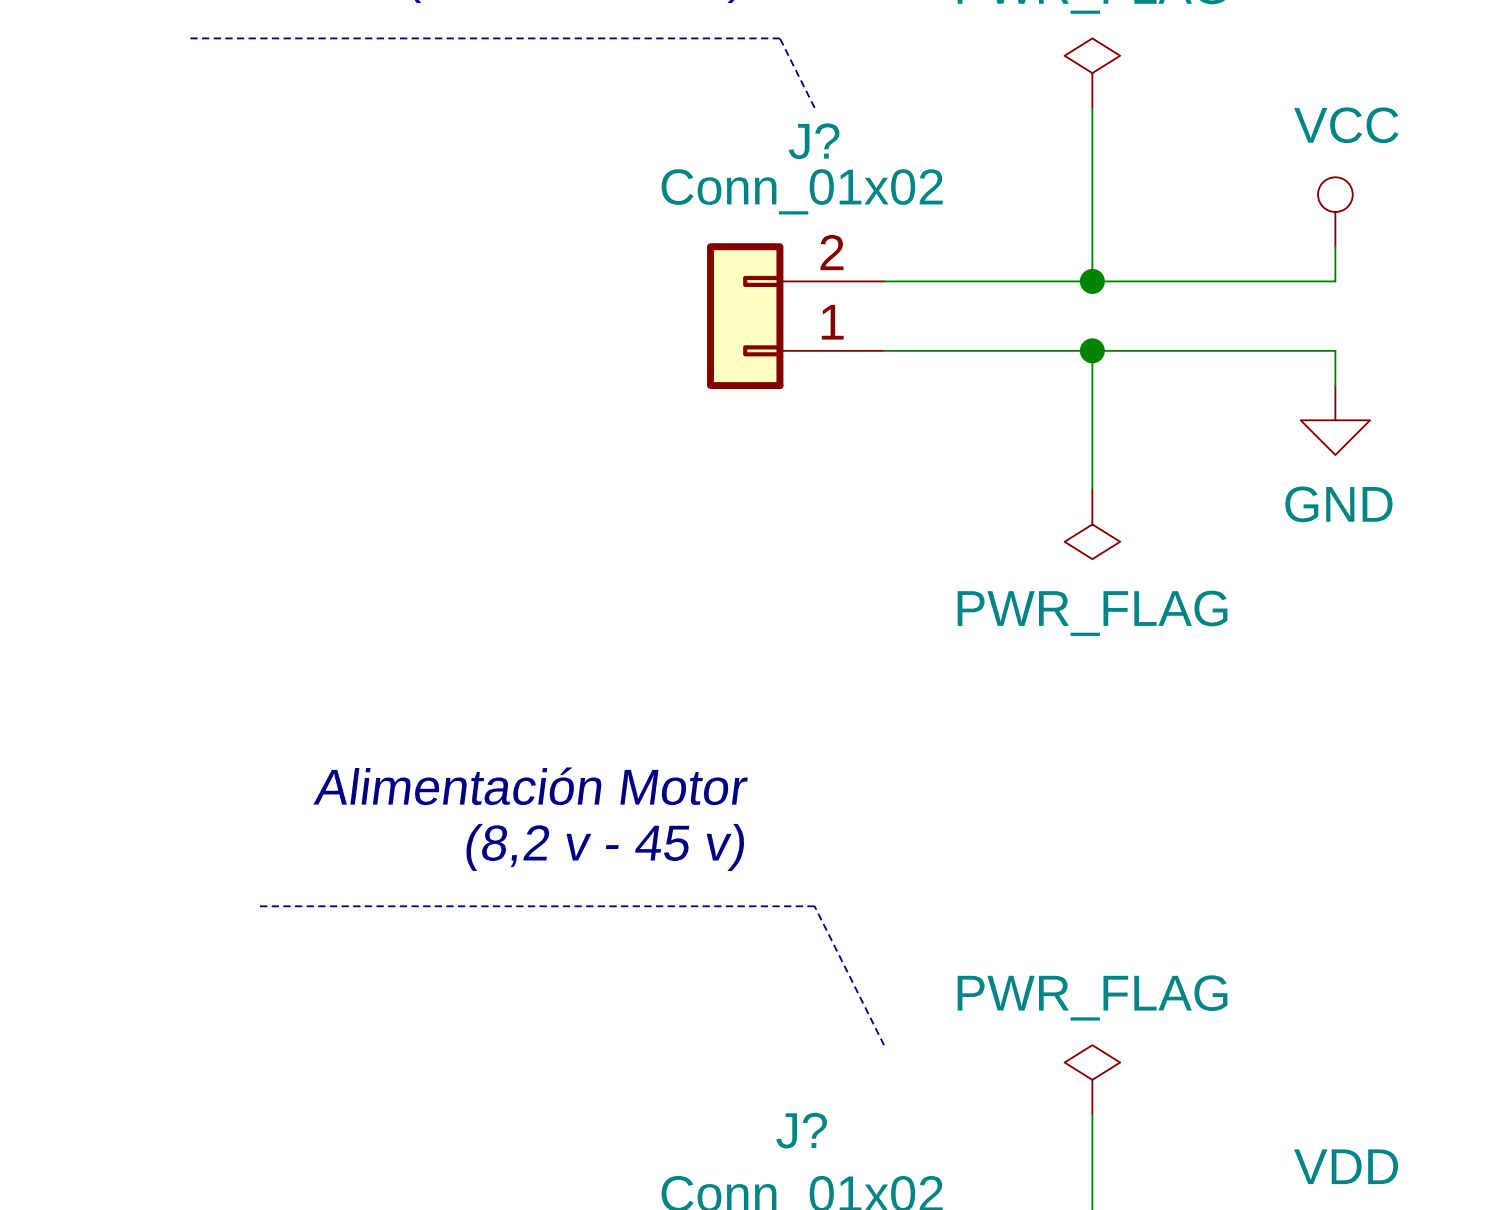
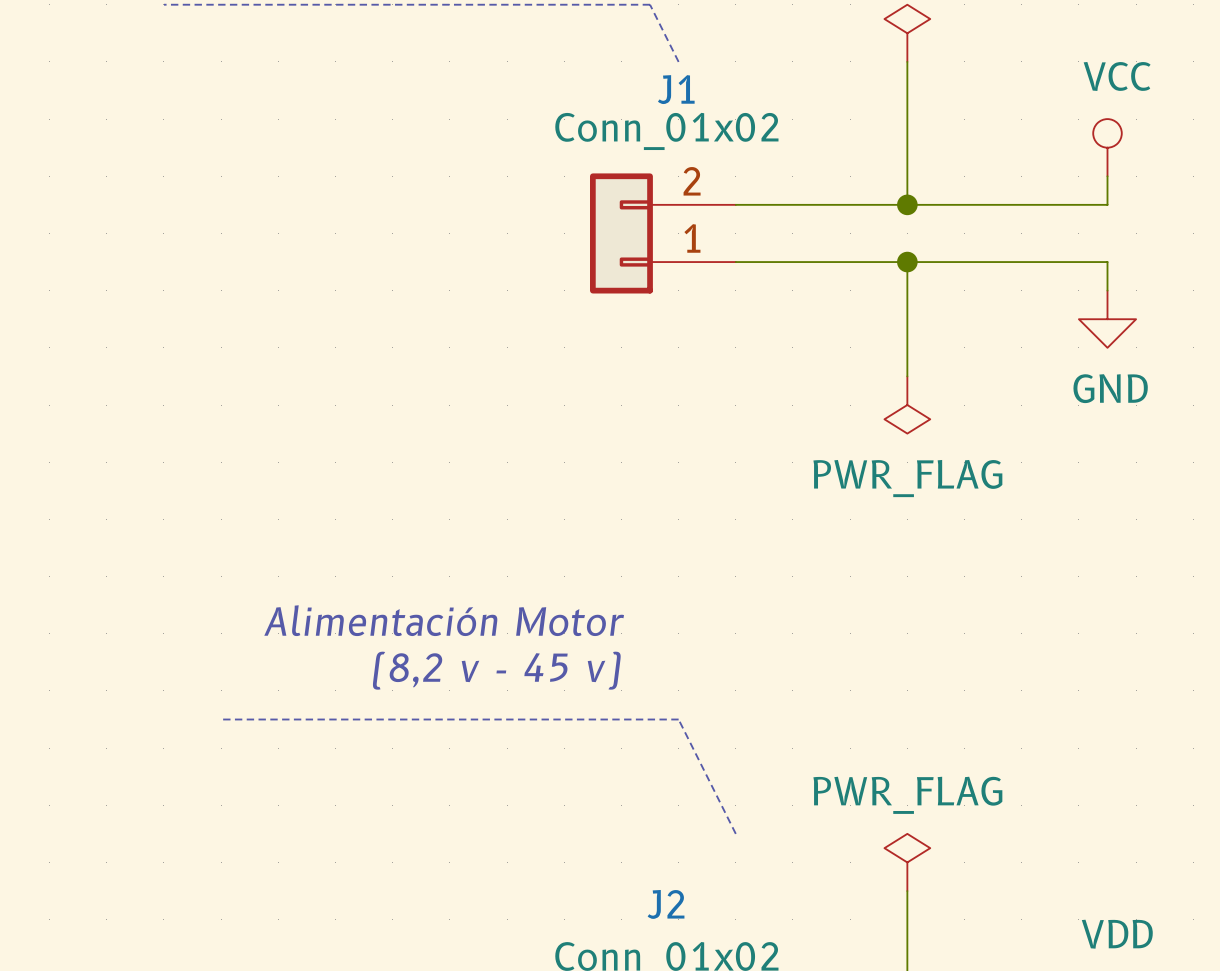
J? name: J? (814, 141) -> J1 (676, 89)
J? name: J? (801, 1130) -> J2 (666, 904)

